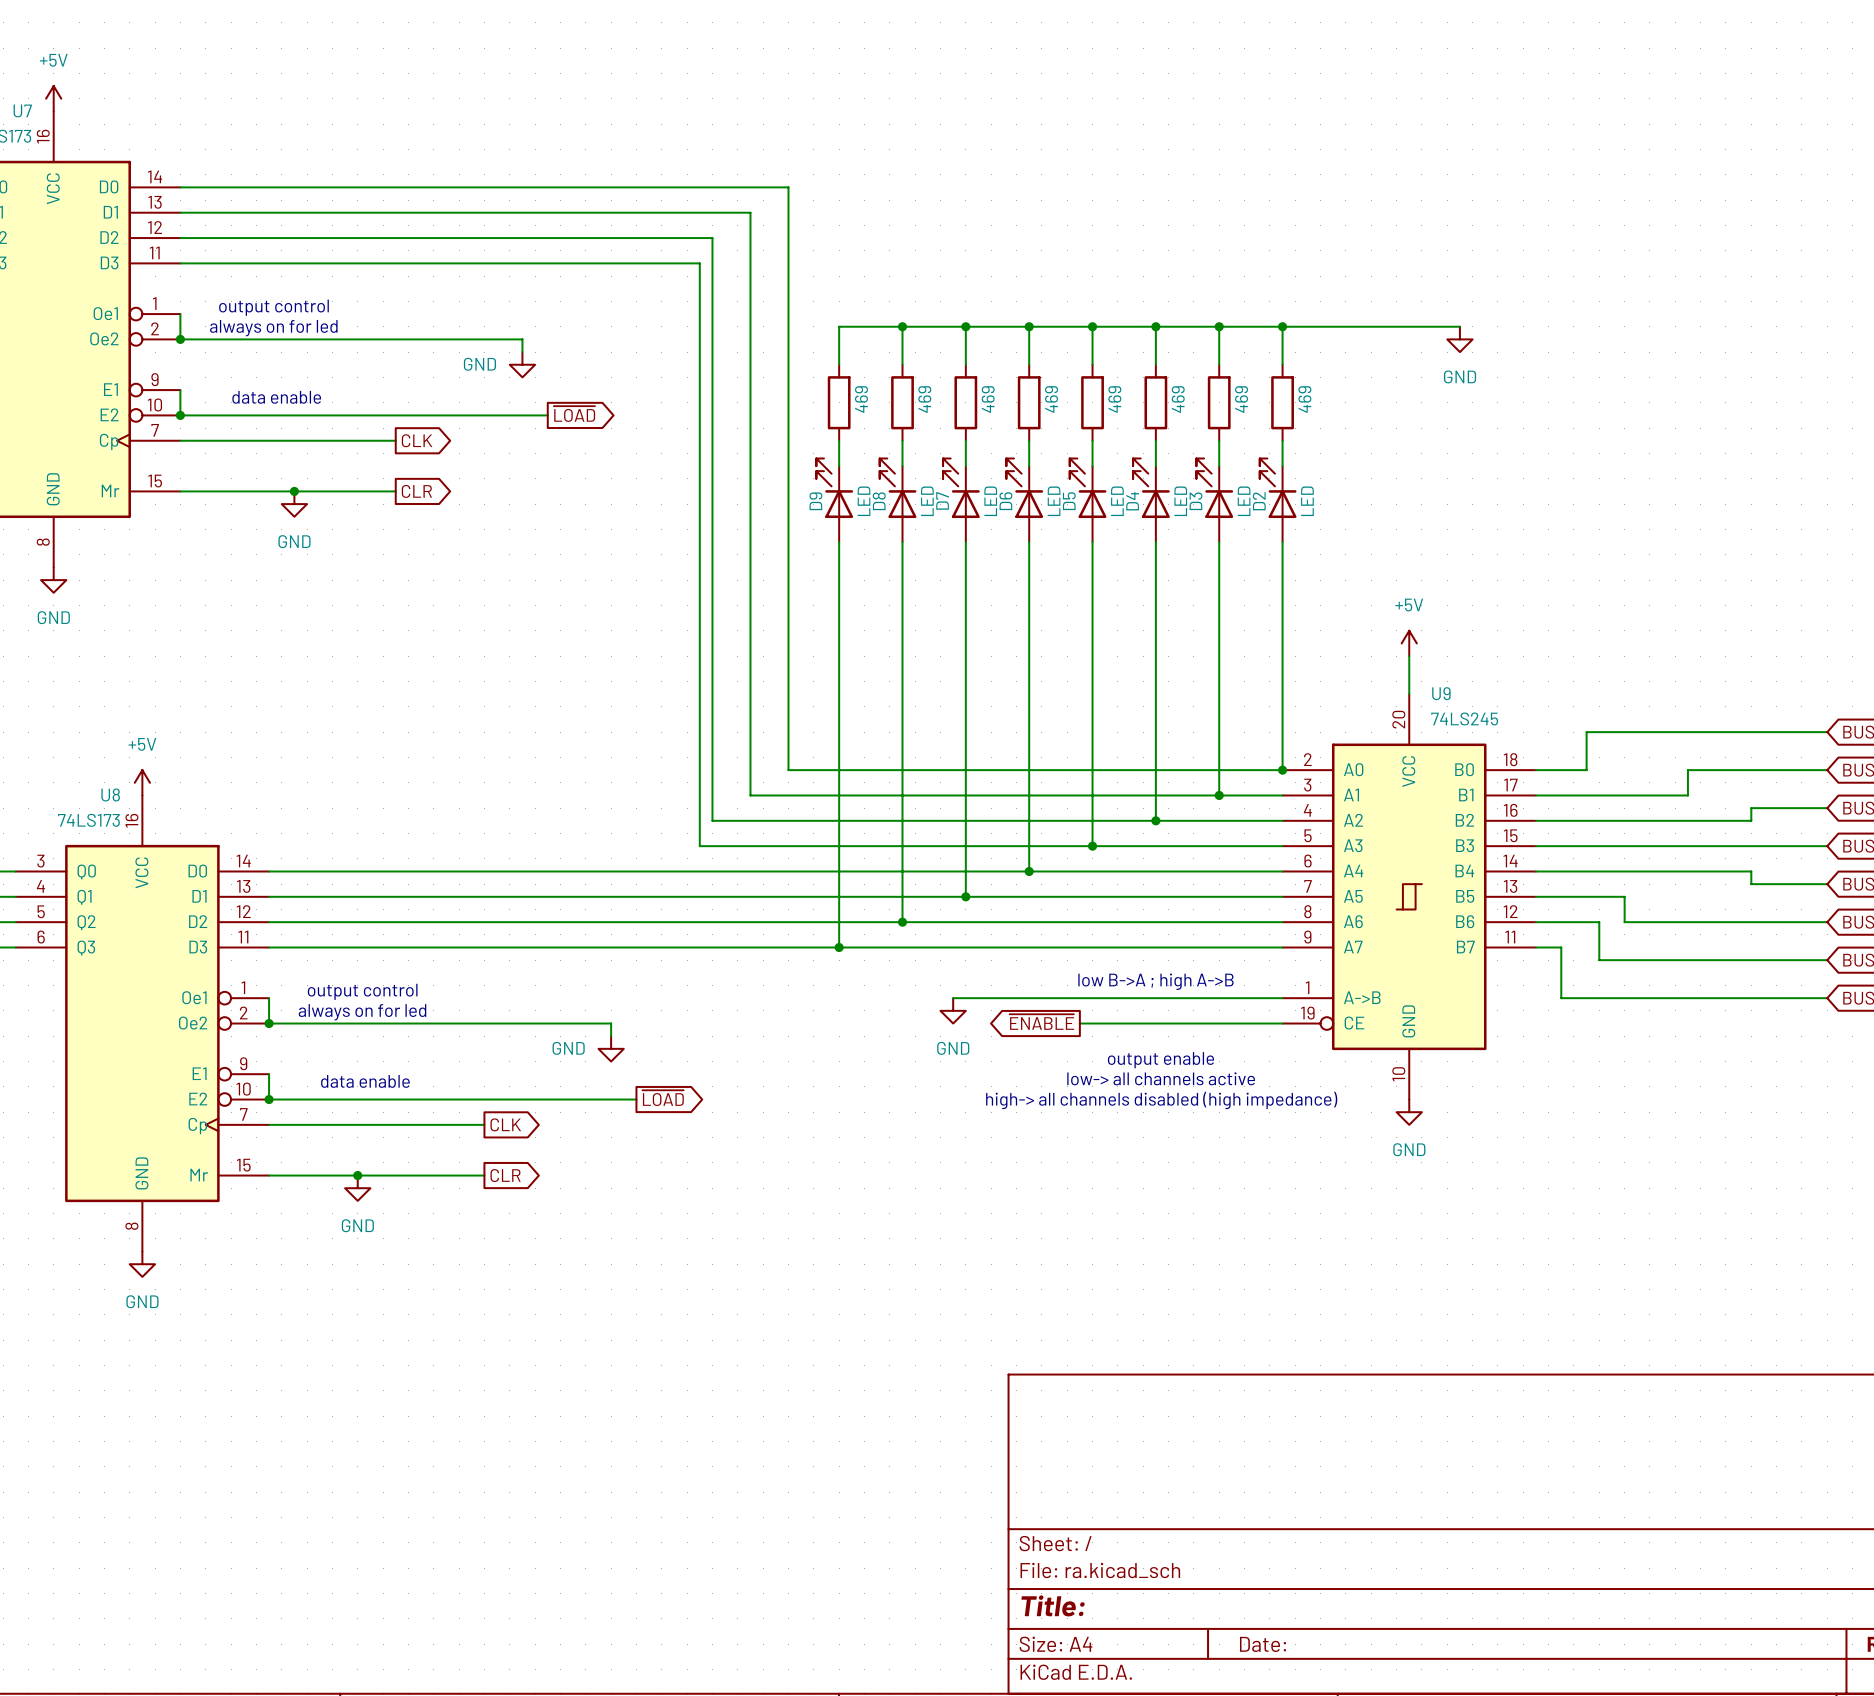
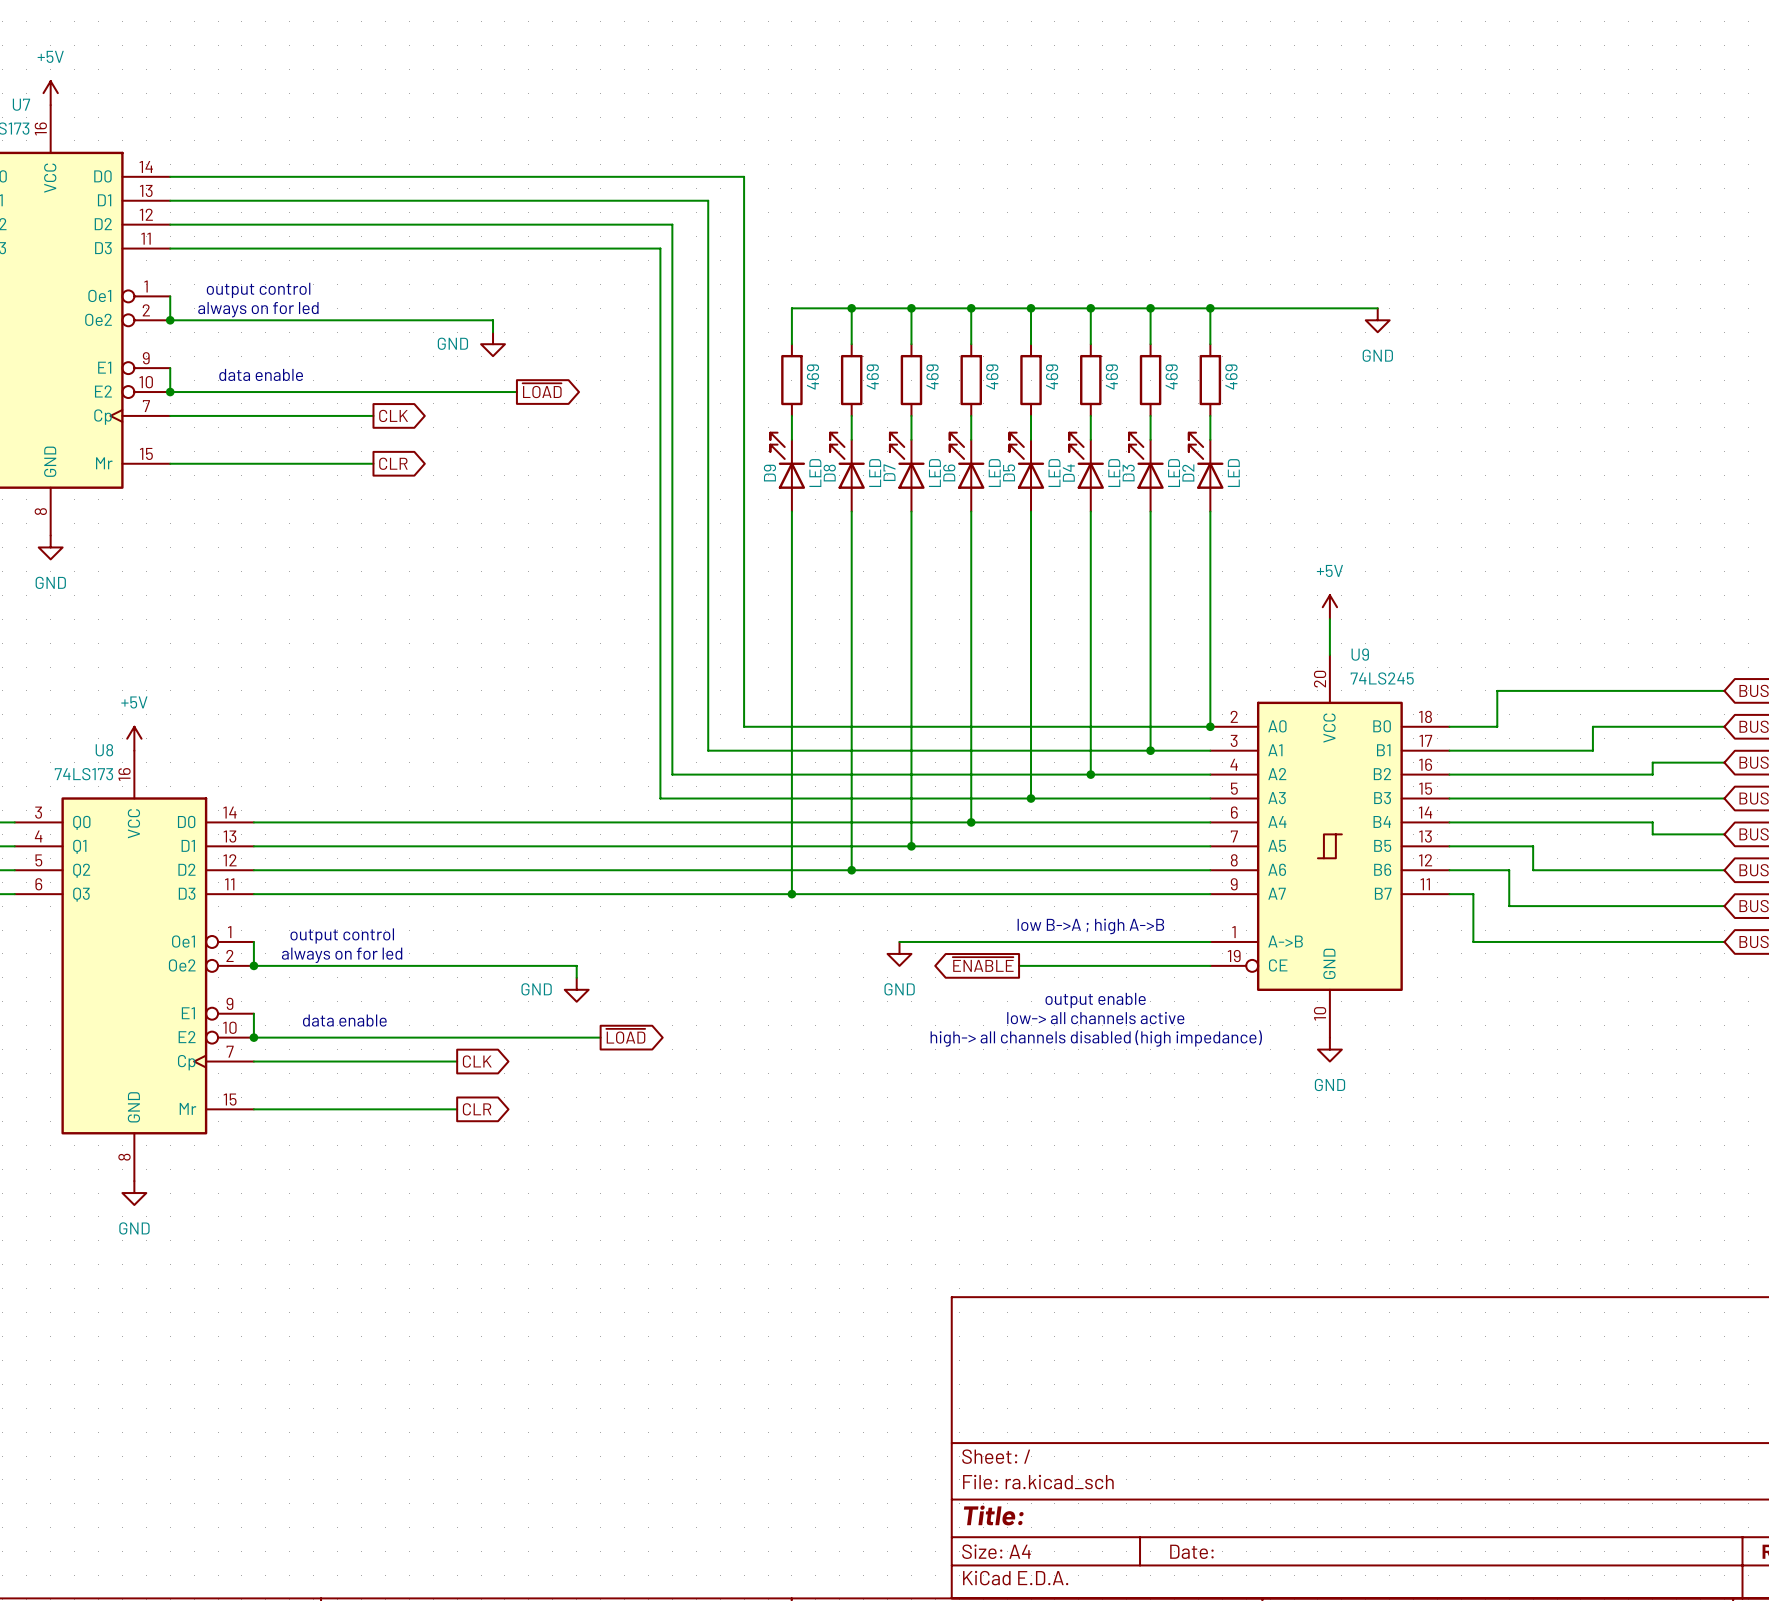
junction: (294, 491) -> none
power symbol: GND (294, 504) -> none
junction: (357, 1175) -> none
power symbol: GND (357, 1188) -> none

